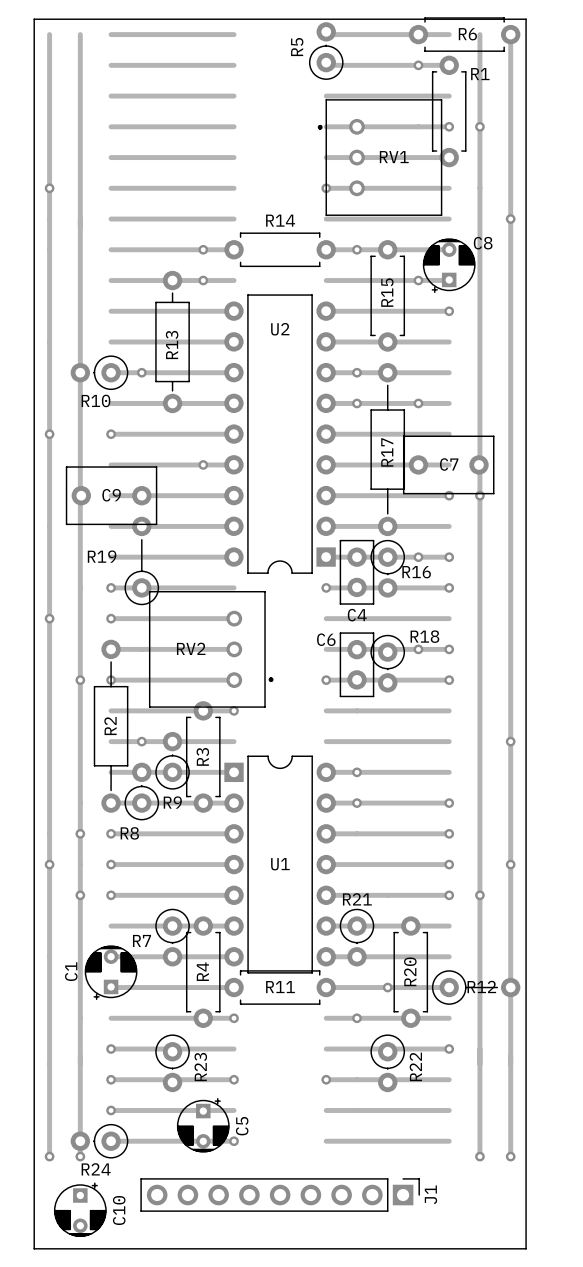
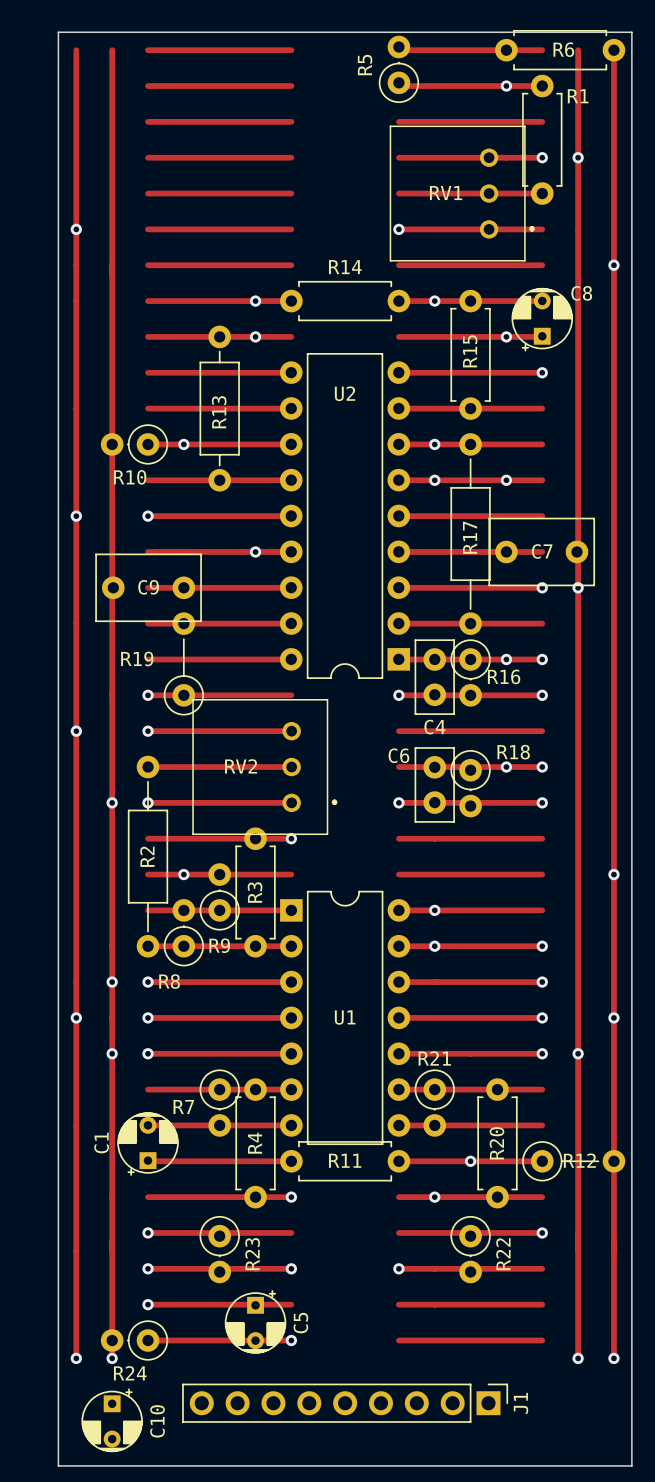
RV1 rotation: 0° (379, 157) -> 180° (462, 193)

